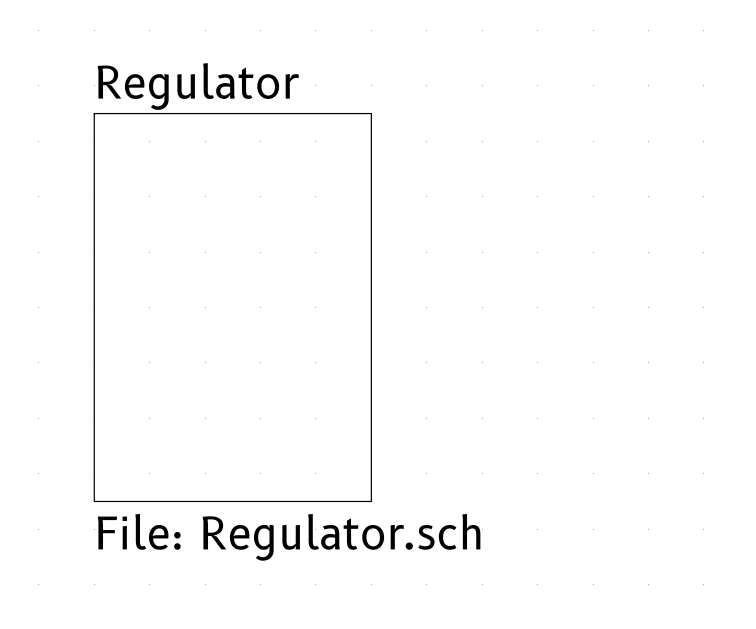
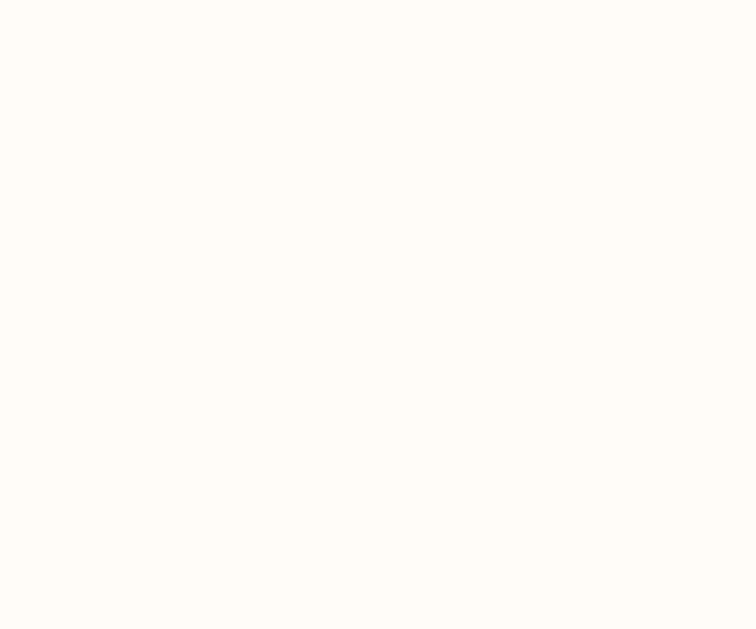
sheet Regulator: File: Regulator.sch (232, 307) -> none

